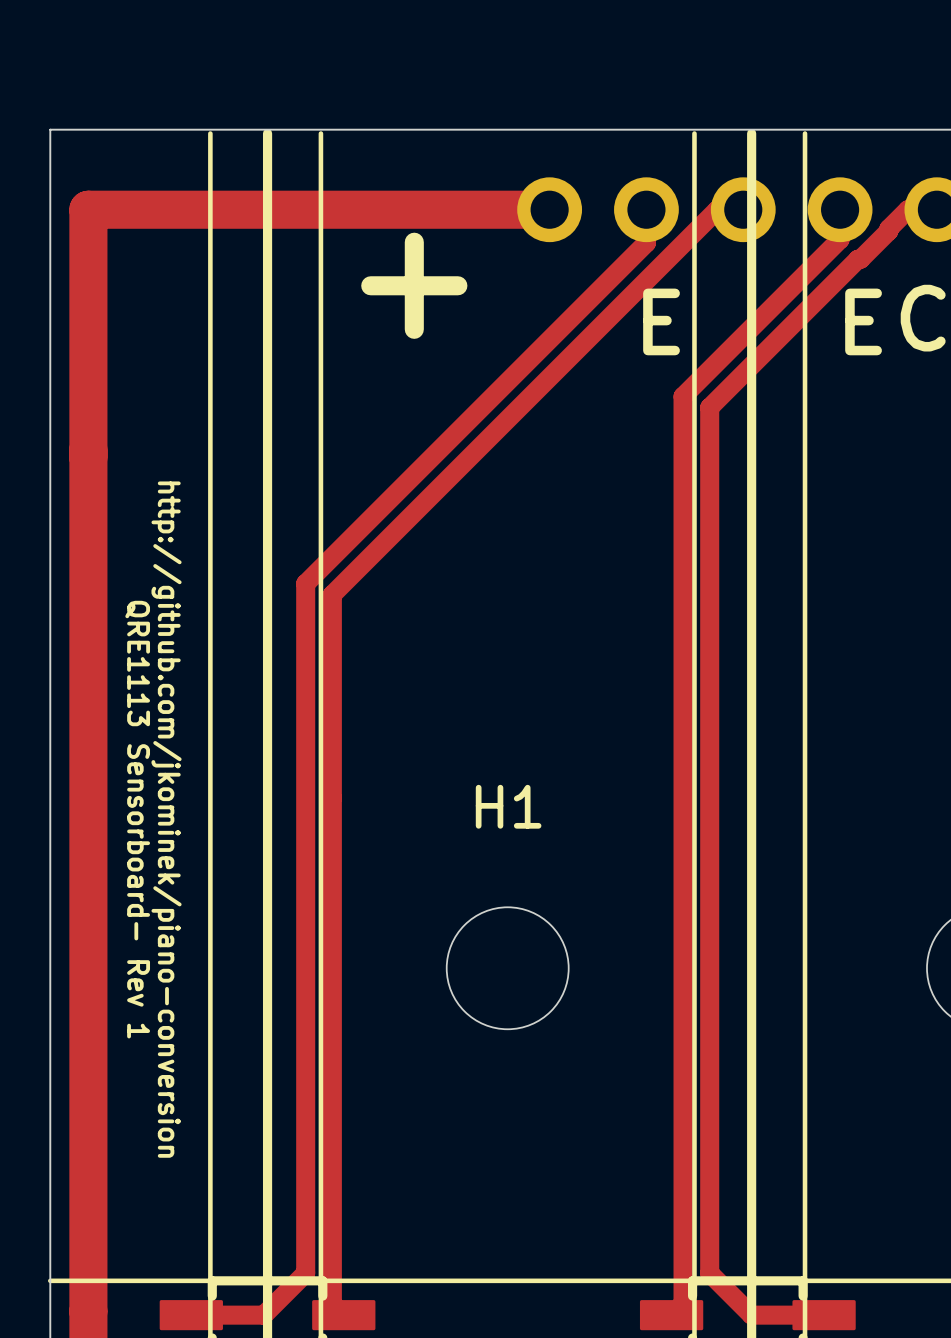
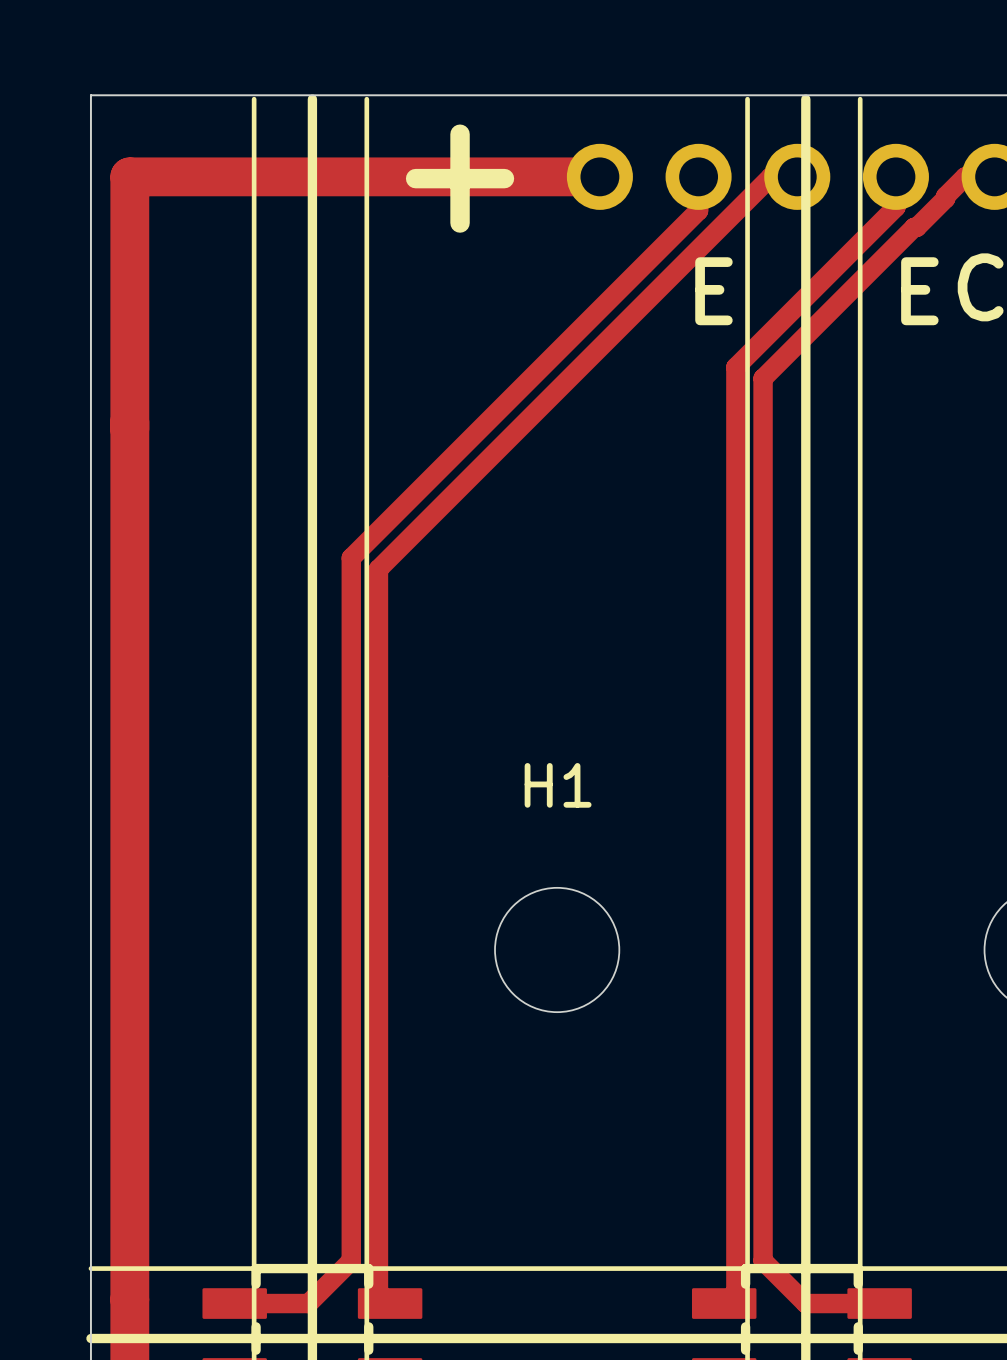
text position: + (414, 285) -> + (460, 178)
text: QRE1113 Sensorboard- Rev 1 (137, 819) -> none
text: http://github.com/jkominek/piano-conversion (166, 819) -> none

